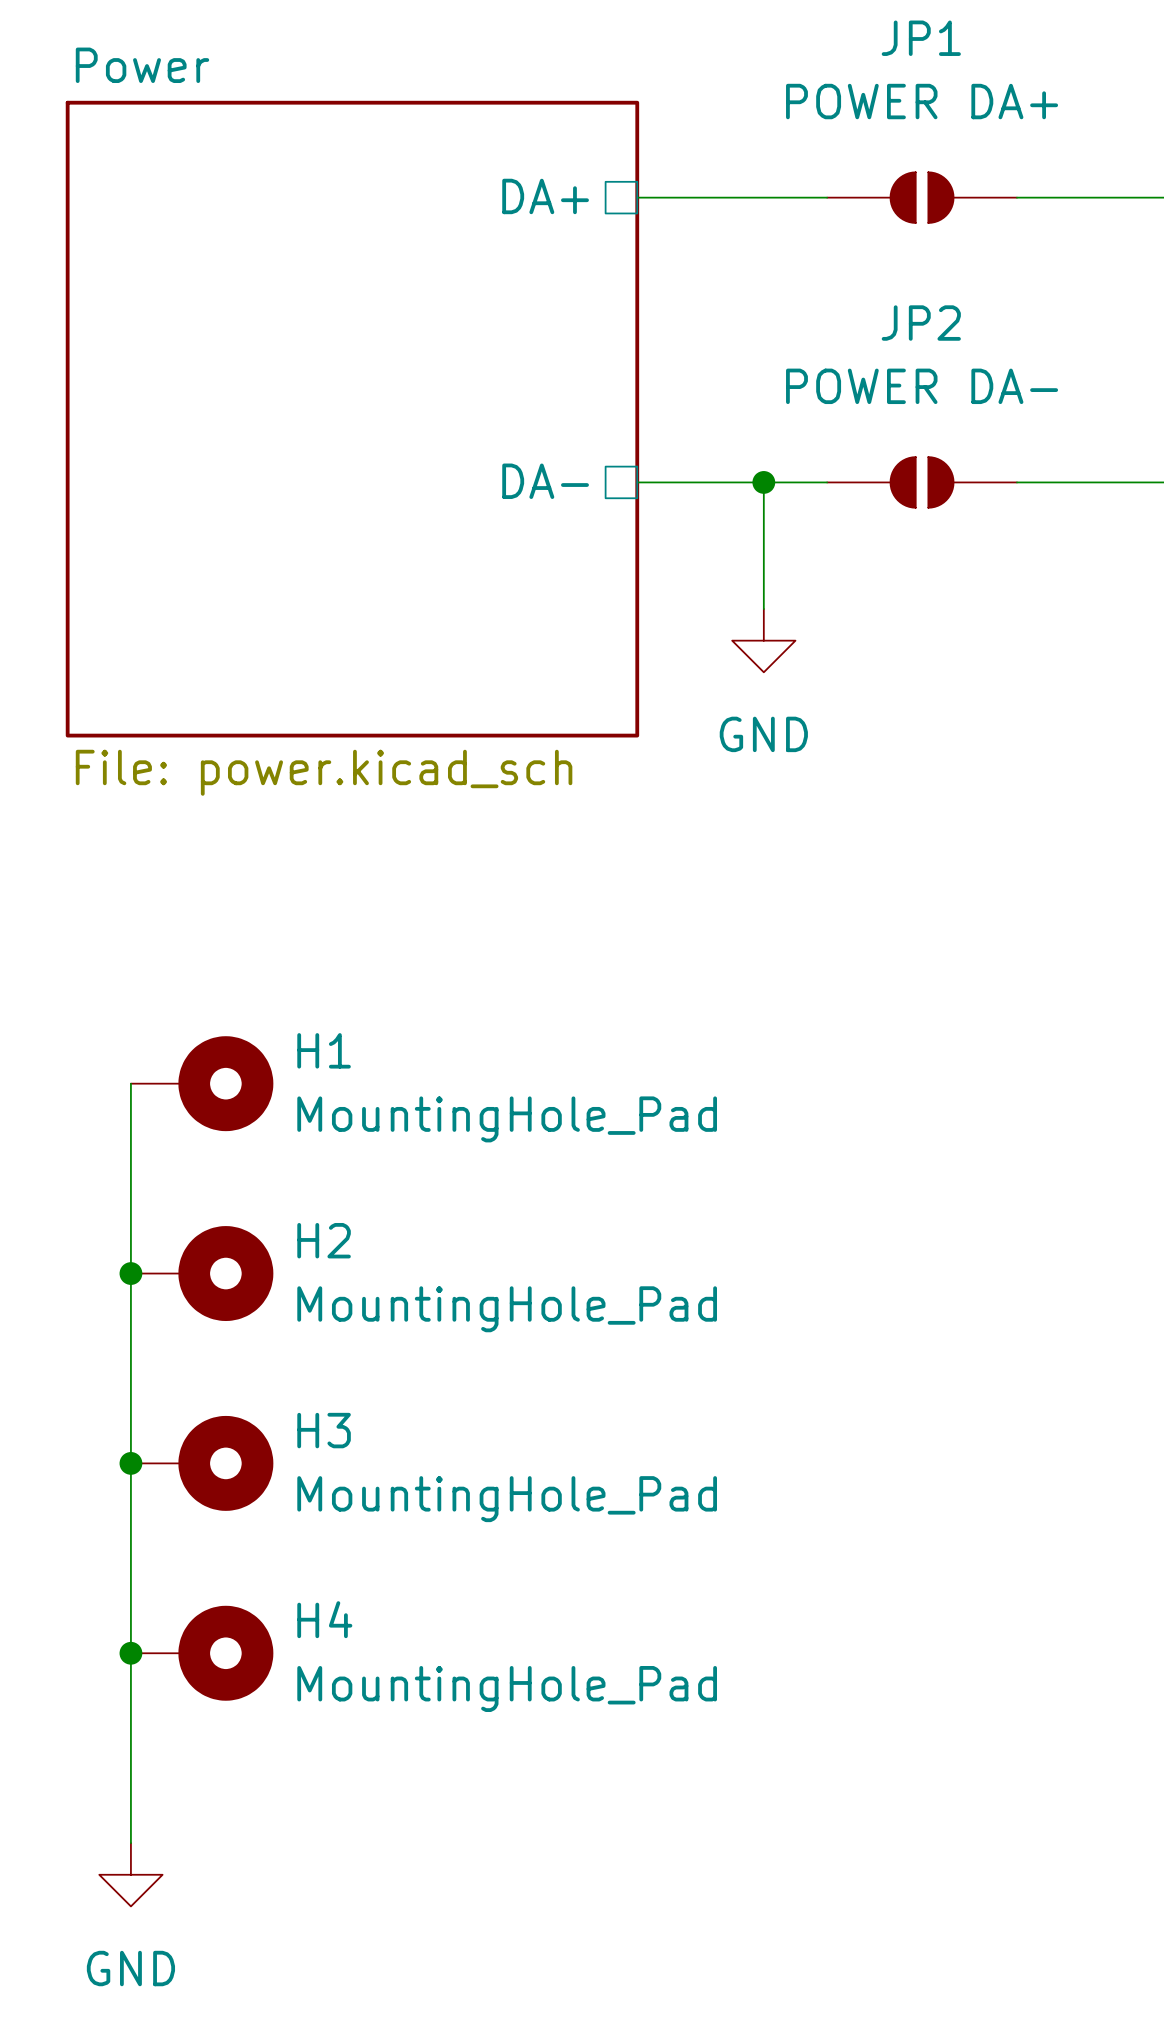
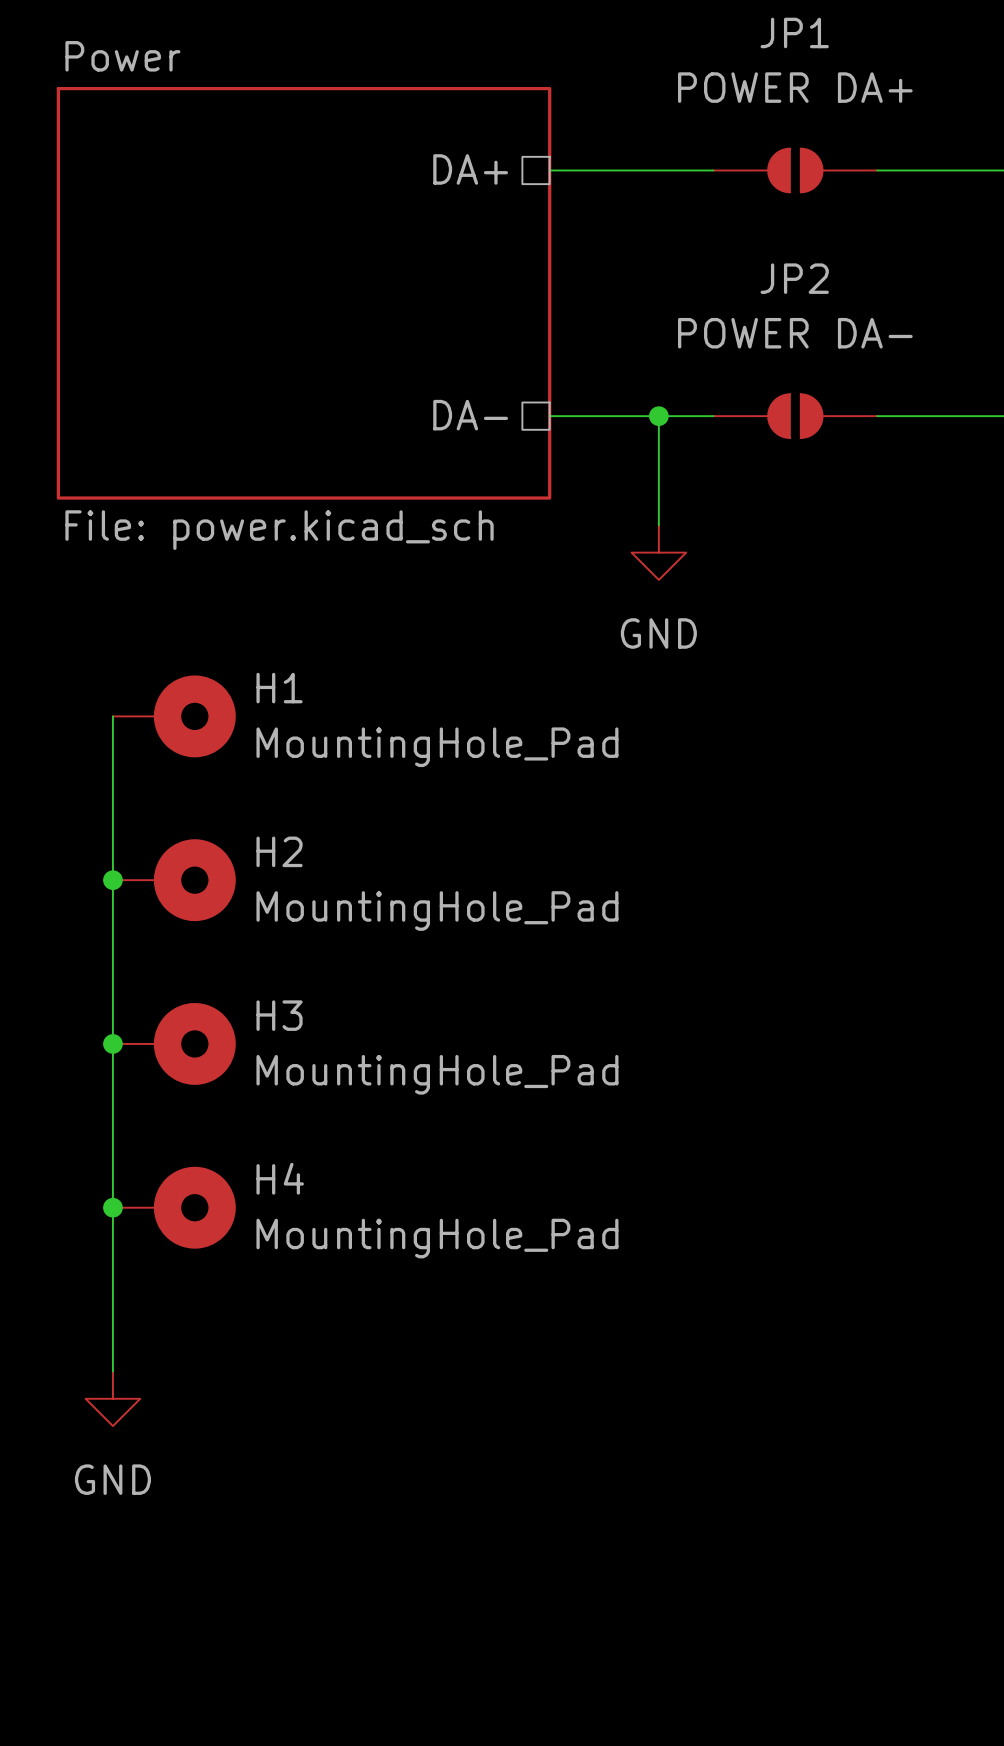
sheet Power: none -> File: power.kicad_sch (304, 293)
sheet Power: File: power.kicad_sch (352, 419) -> none
wire: none -> (112, 716) (112, 934)
junction: none -> (112, 880)
H1 position: (202, 1083) -> (174, 716)
junction: none -> (112, 1043)
junction: (130, 1273) -> none
H2 position: (202, 1273) -> (174, 880)
junction: none -> (112, 1207)
junction: (130, 1463) -> none
H3 position: (202, 1463) -> (174, 1043)
wire: (130, 1589) (130, 1843) -> none
junction: (130, 1653) -> none
H4 position: (202, 1653) -> (174, 1207)
power symbol position: GND (130, 1874) -> GND (112, 1398)

